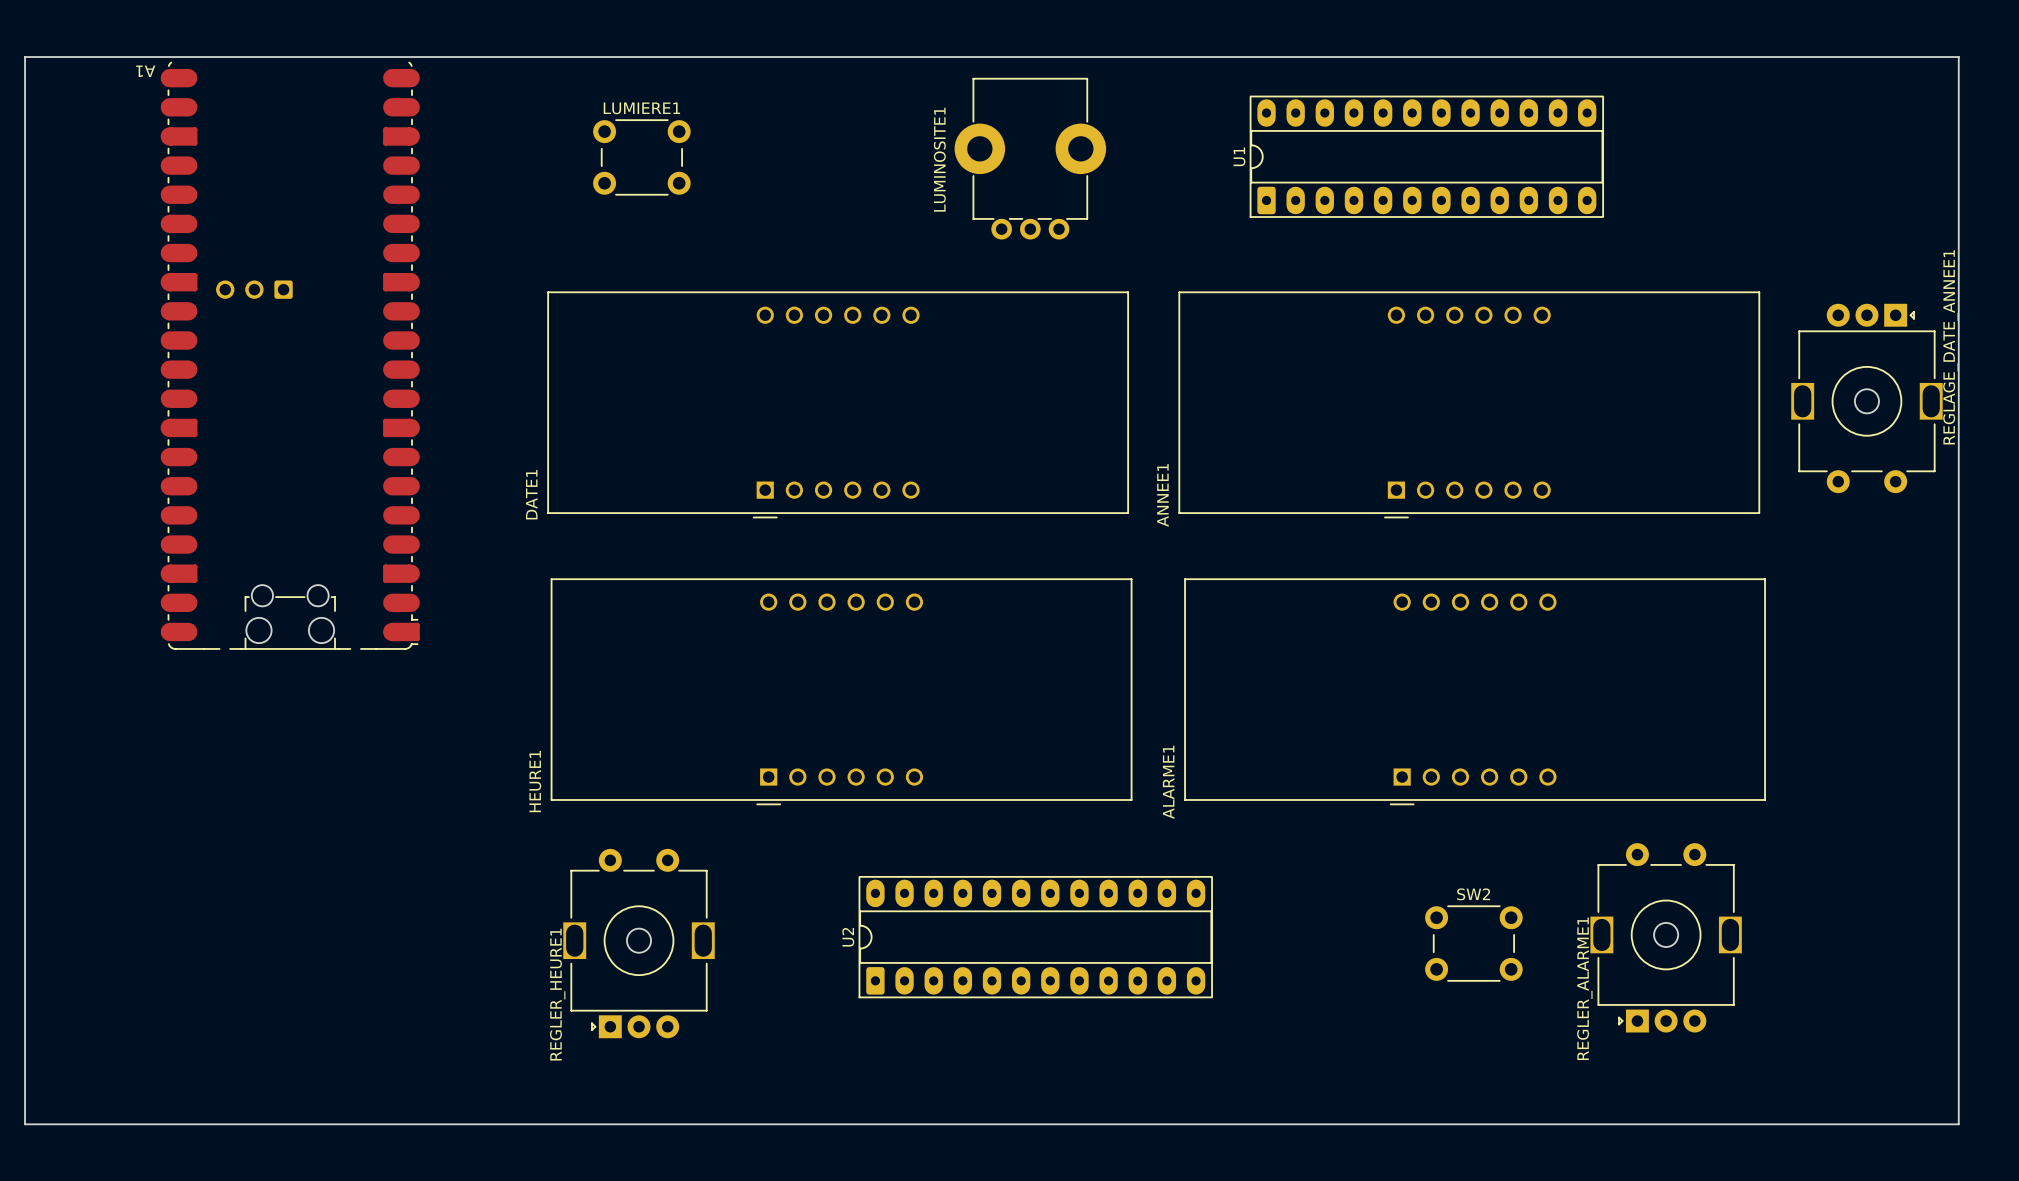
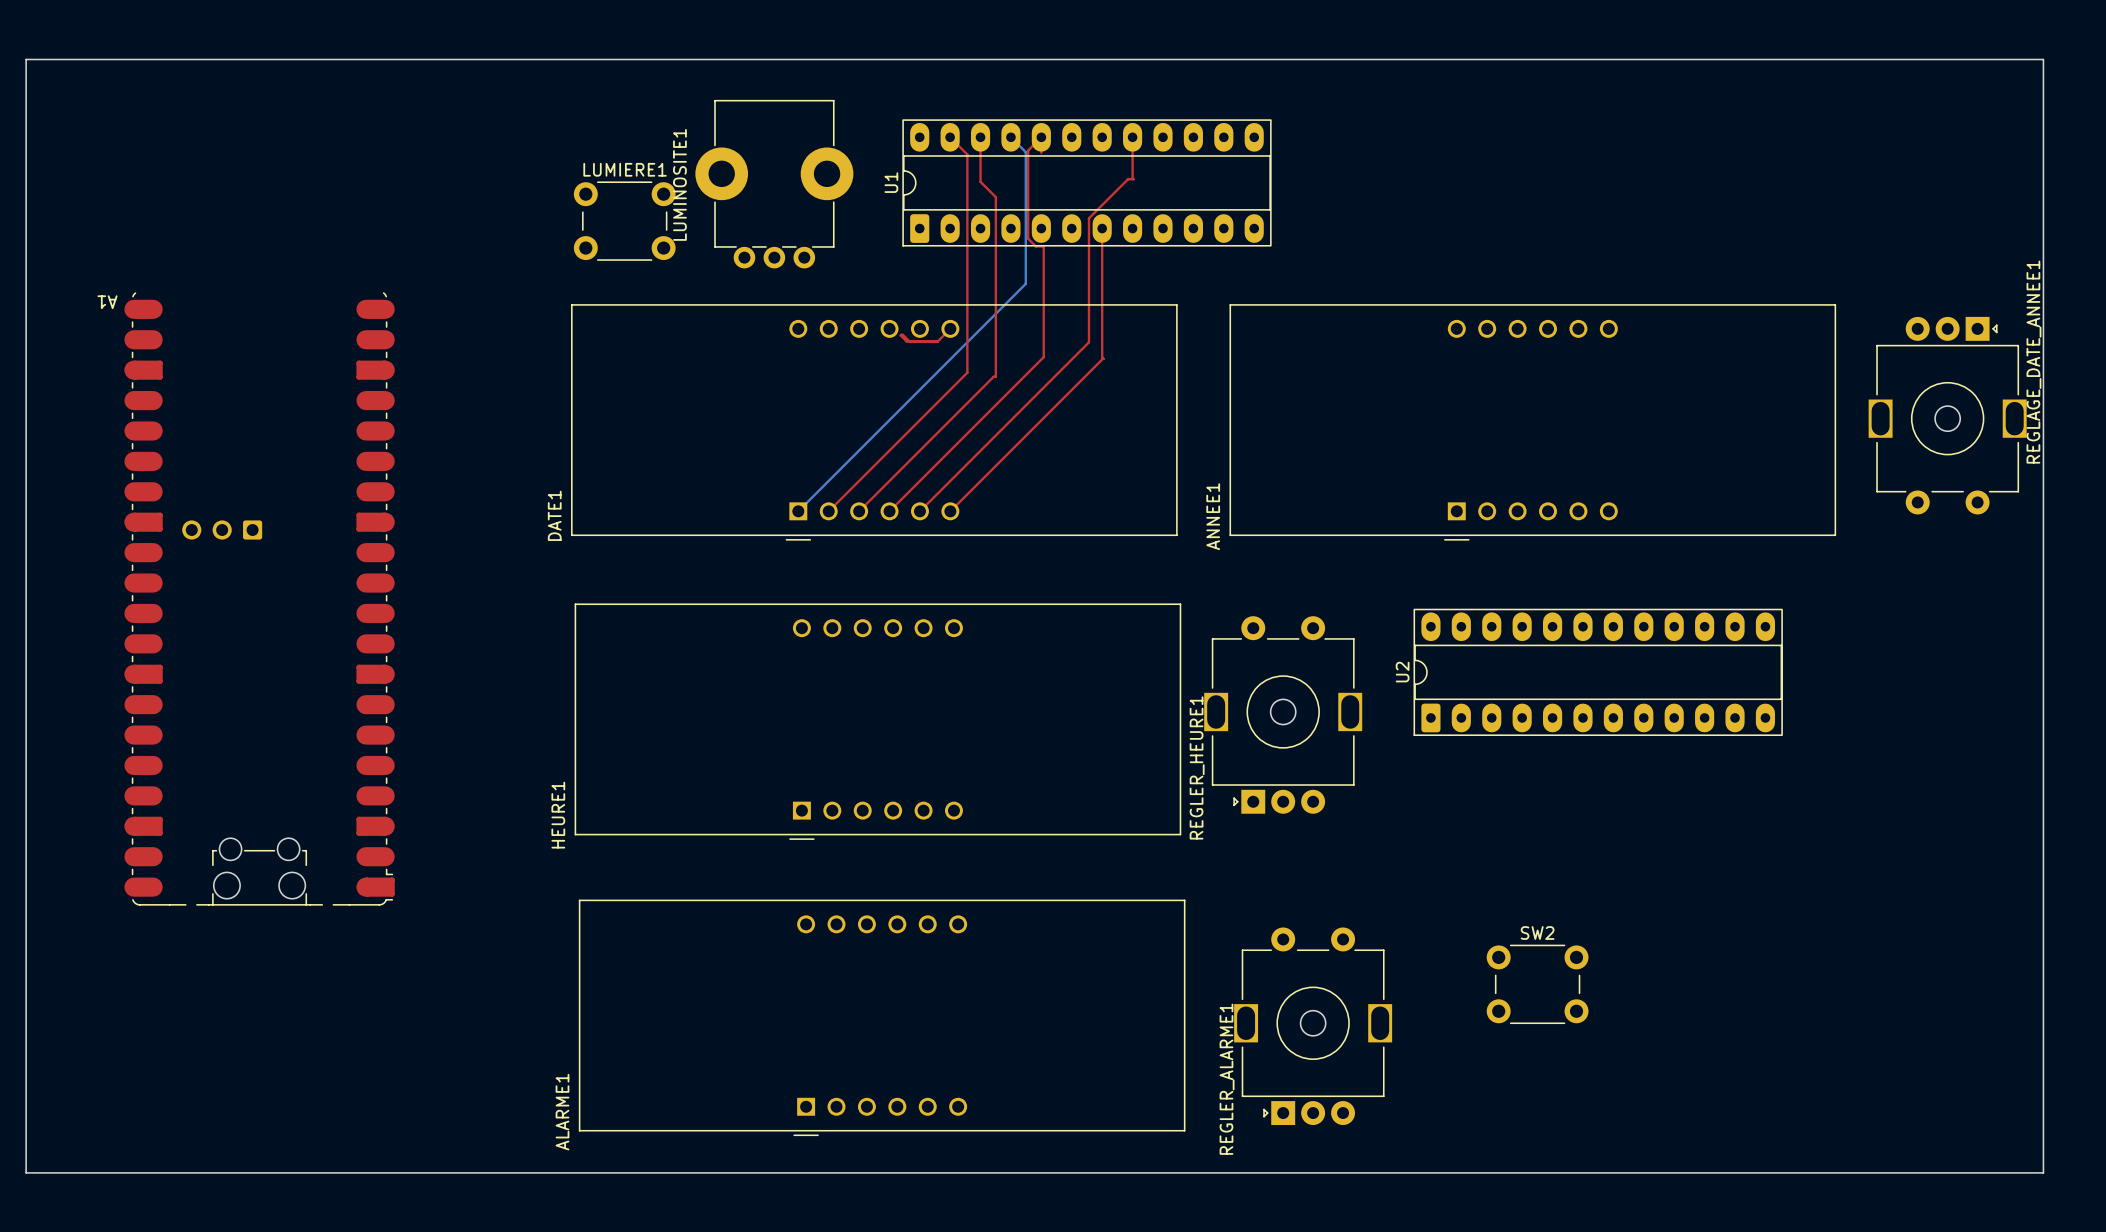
top track: none -> (950, 137) (967, 154) (967, 372) (828, 511)
top track: none -> (980, 137) (980, 181) (995, 197) (995, 376) (993, 376) (859, 511)
bottom track: none -> (1010, 137) (1025, 152) (1025, 283) (798, 511)
top track: none -> (1132, 137) (1133, 179) (1128, 179) (1089, 218) (1089, 342) (919, 511)
top track: none -> (1041, 152) (1041, 137) (1028, 150) (1028, 238) (1035, 246) (1043, 246) (1043, 357) (889, 511)
U1 position: (1426, 156) -> (1086, 182)
LUMIERE1 position: (641, 157) -> (624, 221)
LUMINOSITE1 position: (1030, 158) -> (774, 184)
top track: none -> (1102, 228) (1103, 358) (950, 511)
top track: none -> (950, 328) (937, 341) (906, 341) (900, 335) (902, 334) (909, 341)
A1 position: (290, 355) -> (259, 598)
ALARME1 position: (1475, 691) -> (882, 1017)
U2 position: (1035, 937) -> (1598, 672)
REGLER_ALARME1 position: (1666, 937) -> (1313, 1026)
REGLER_HEURE1 position: (639, 943) -> (1283, 714)

